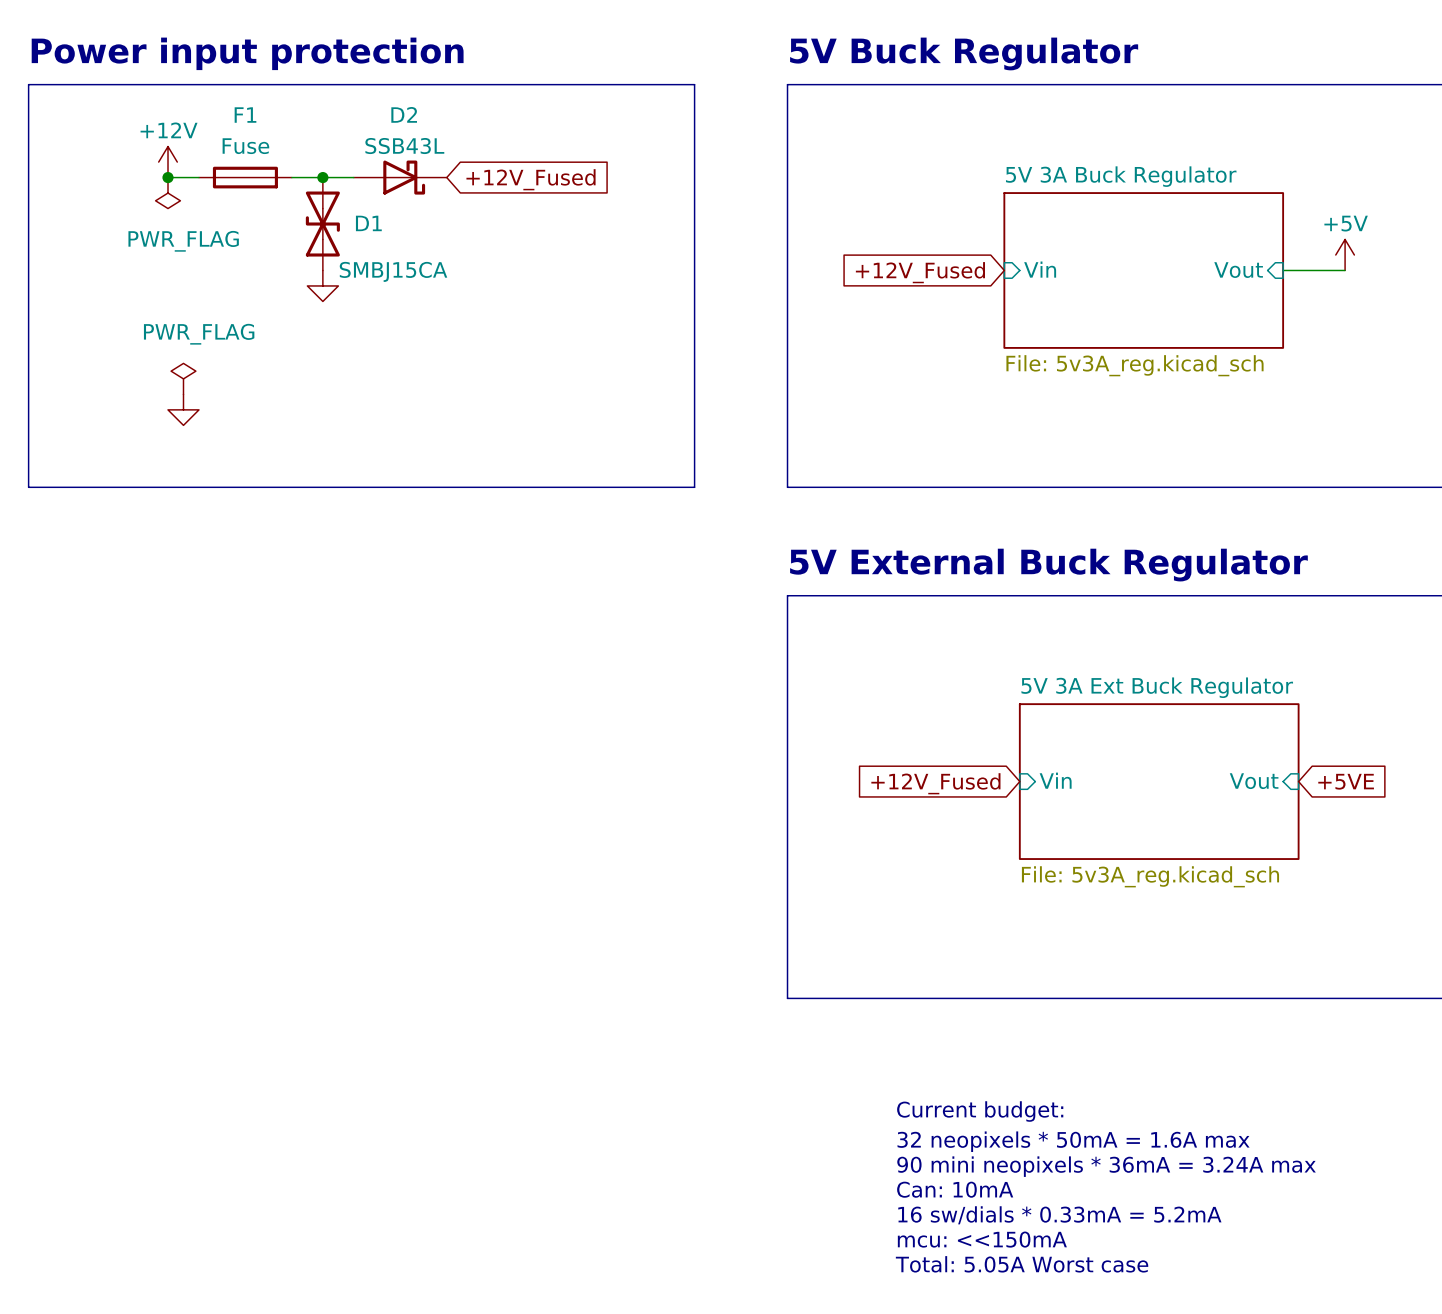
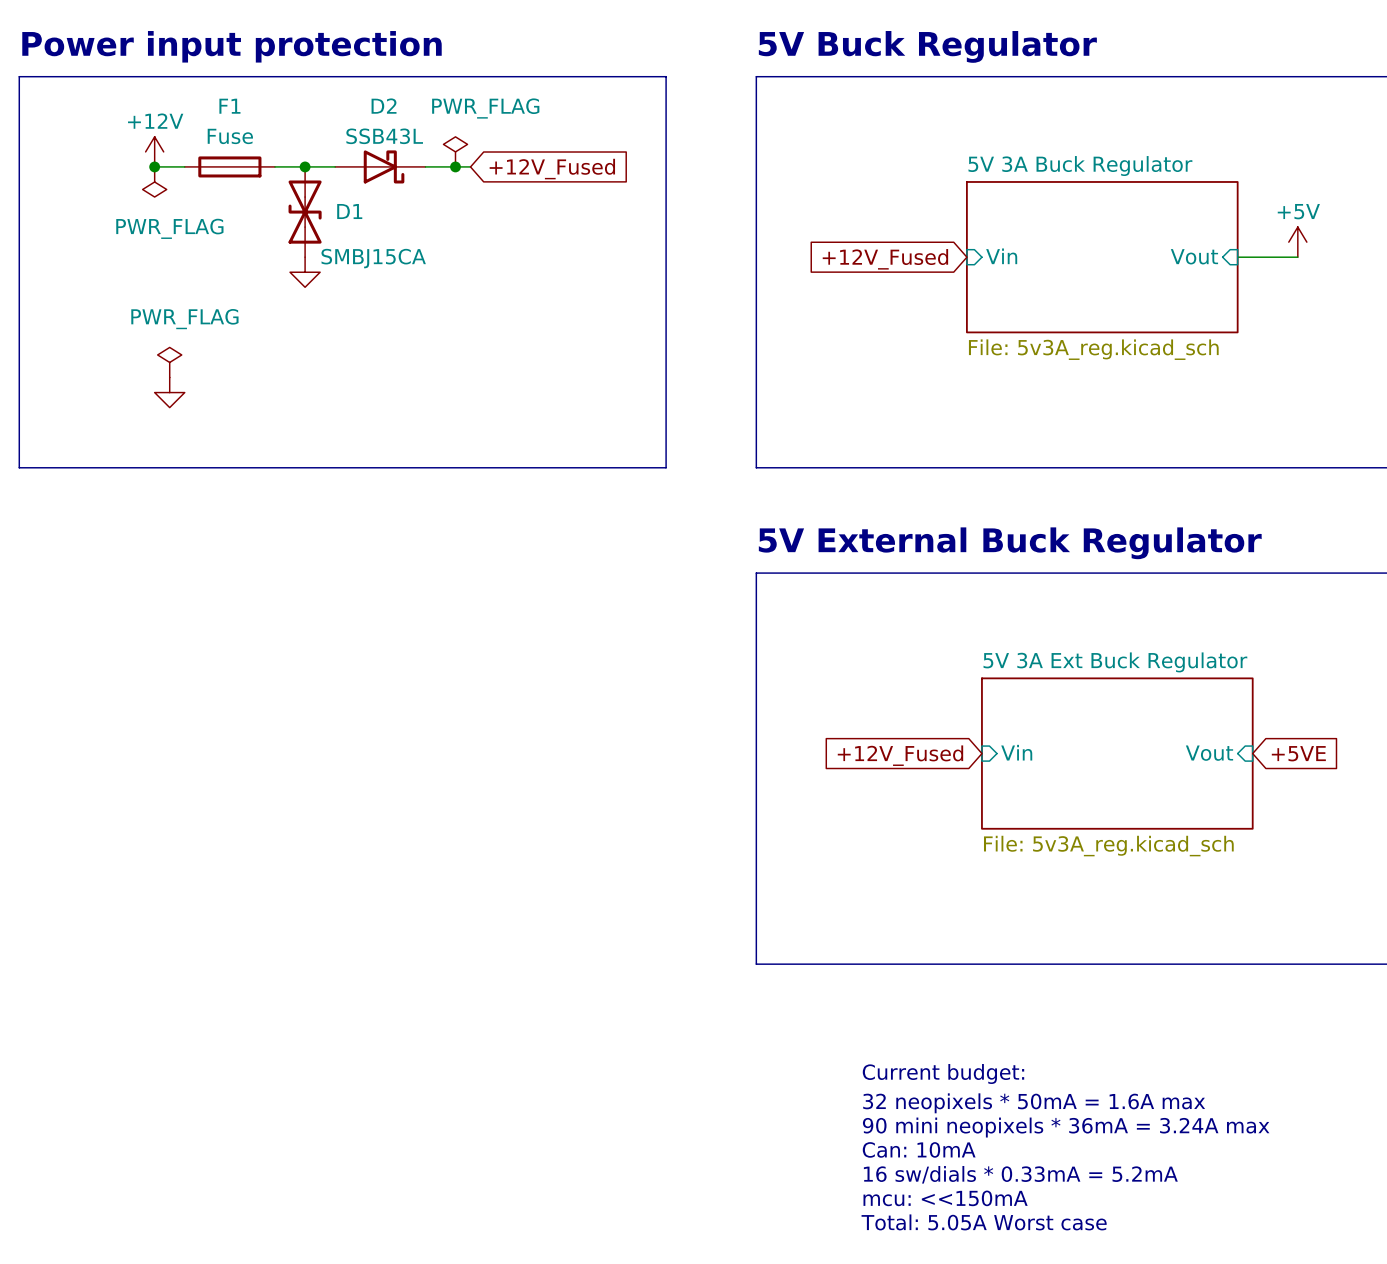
power symbol: none -> PWR_FLAG (455, 151)
wire: none -> (425, 166) (470, 166)
junction: none -> (455, 166)
global label position: +12V_Fused (531, 179) -> +12V_Fused (552, 169)

